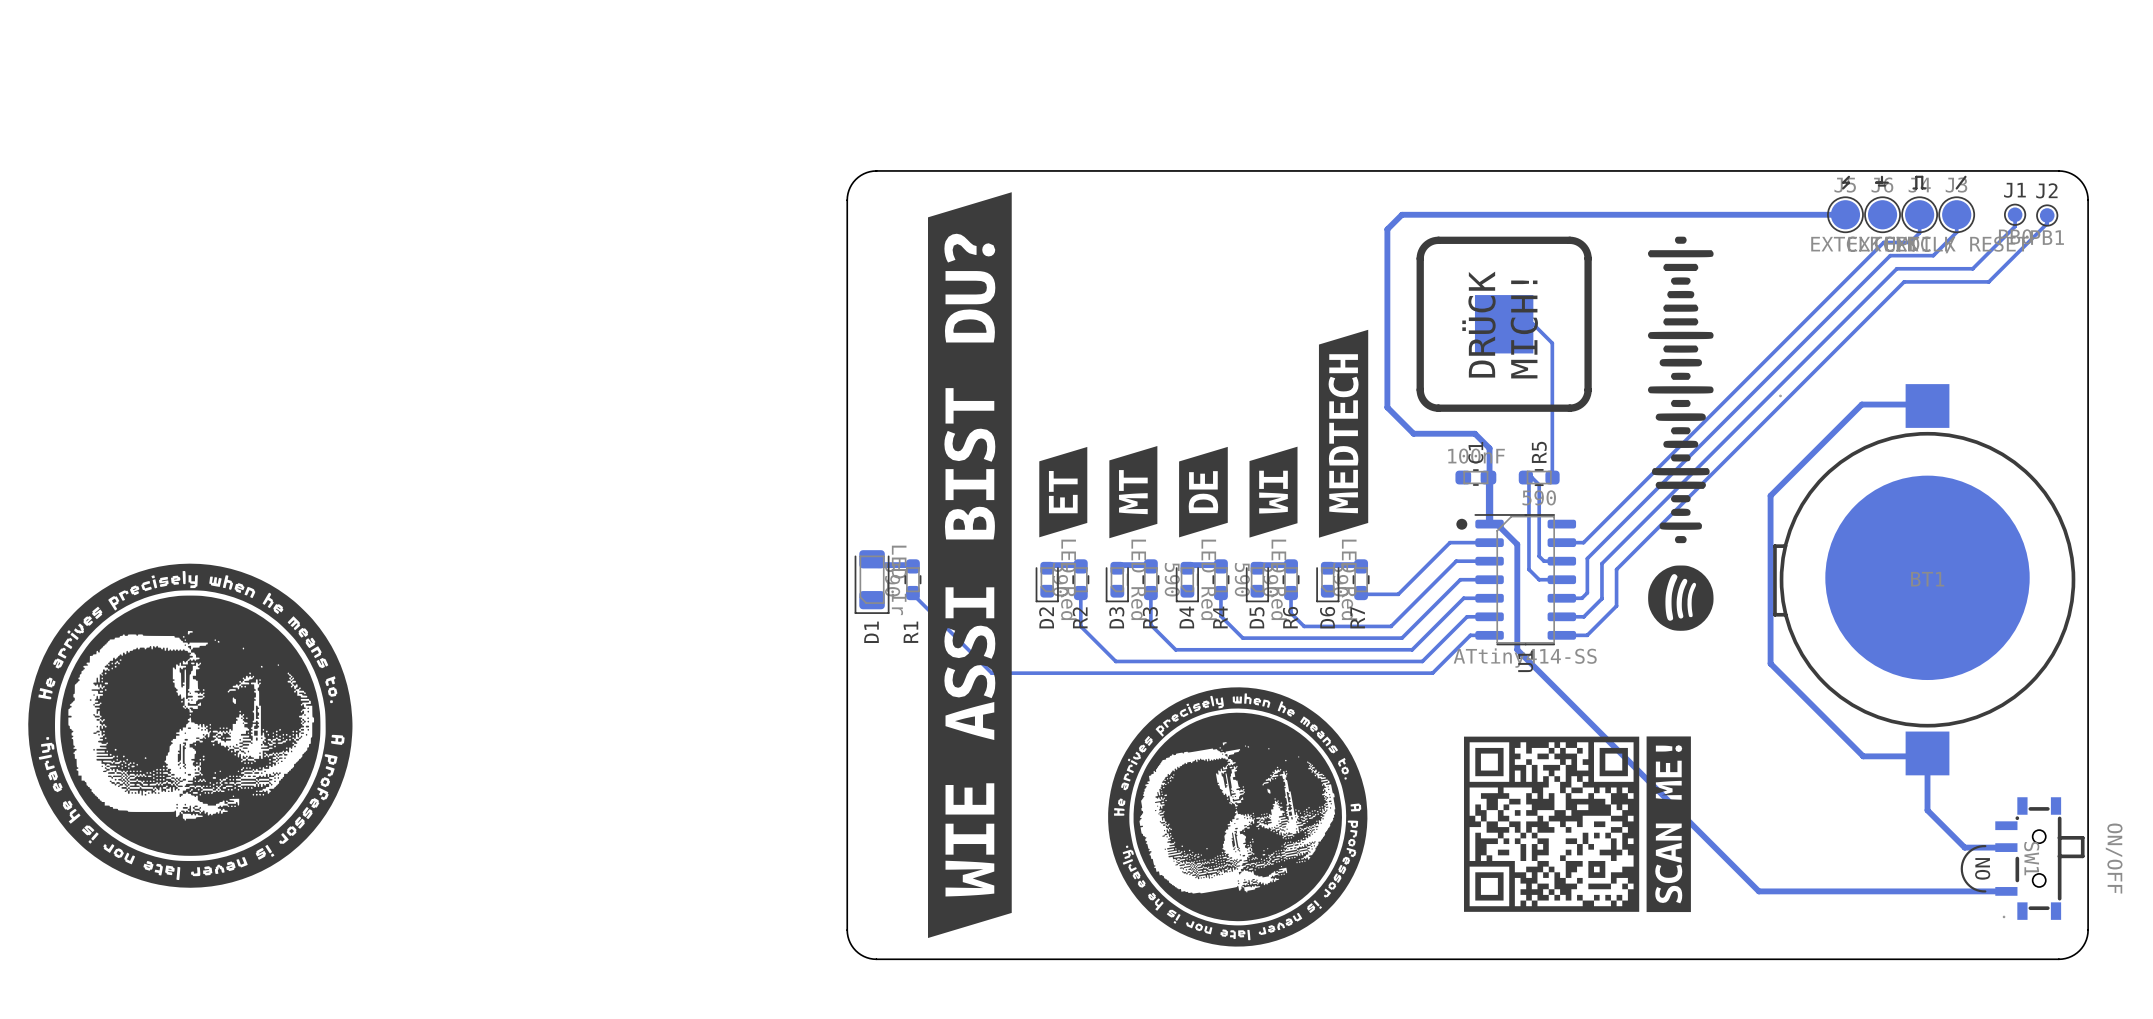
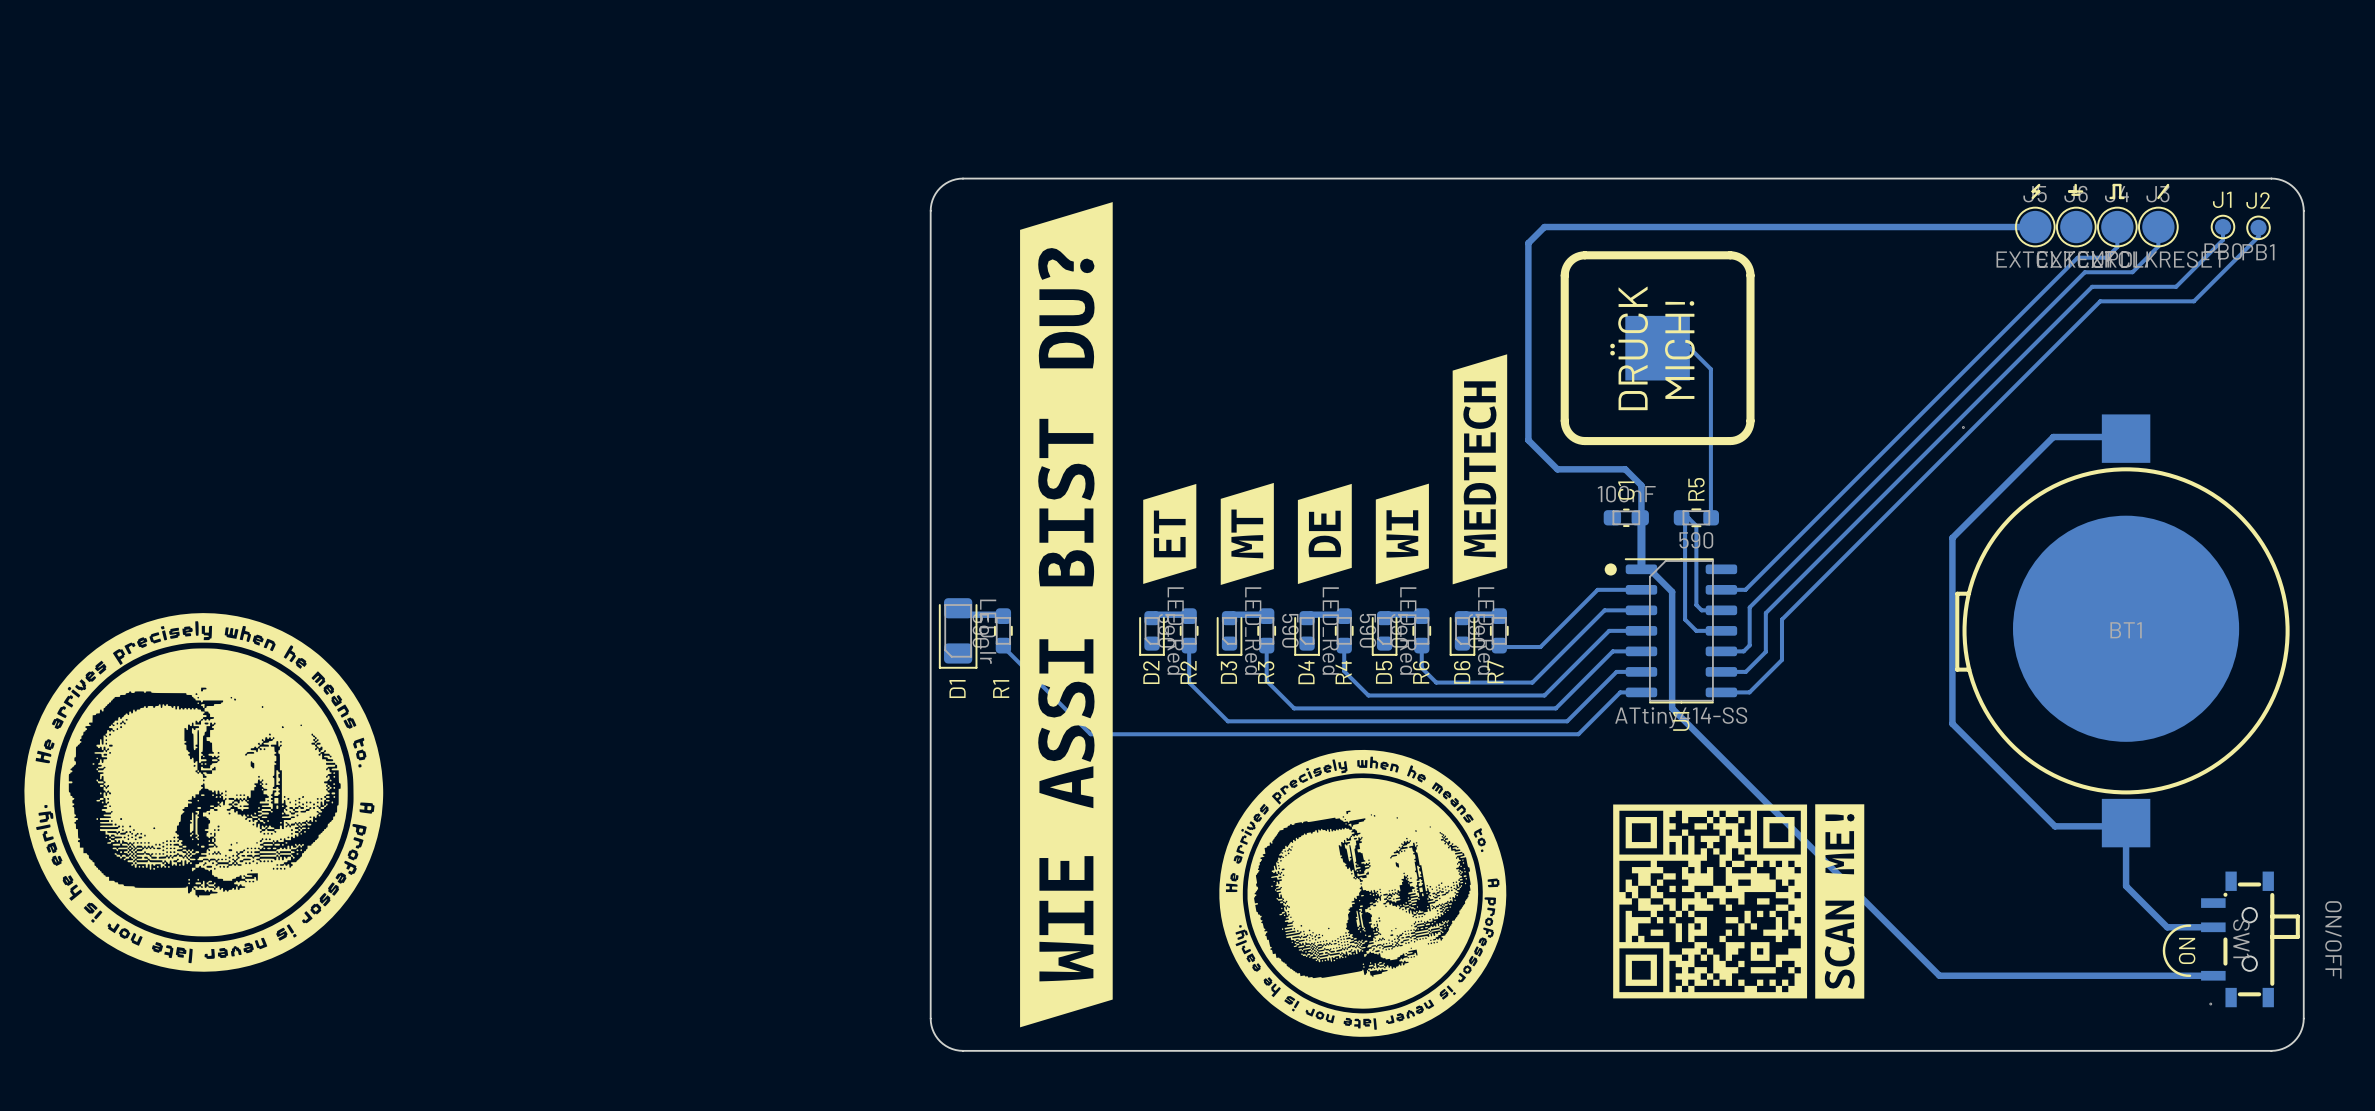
drawing: [1647, 236, 1714, 631] -> none

